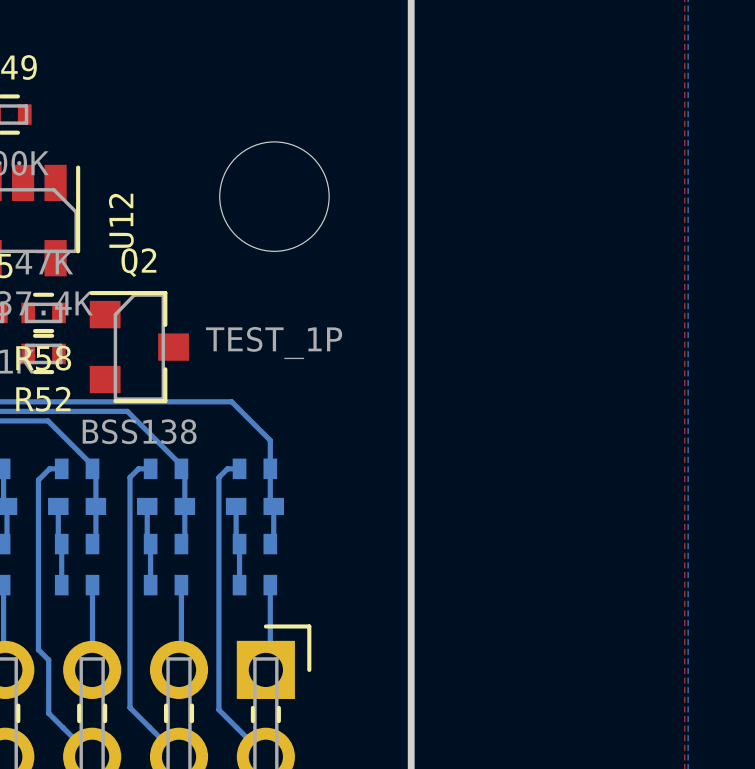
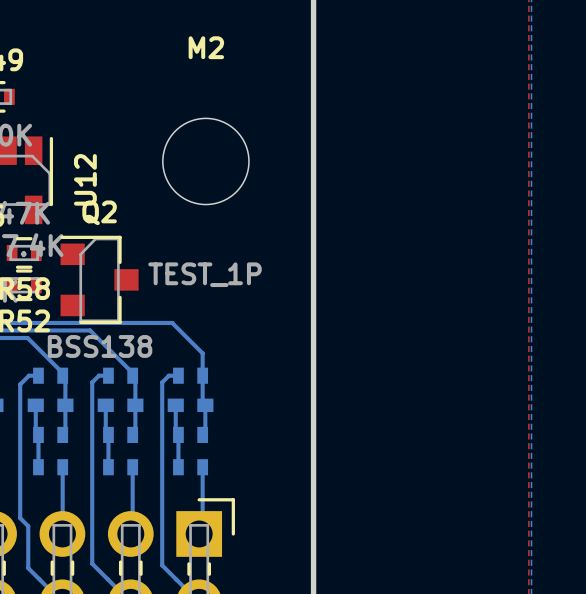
M2 name: none -> M2 (206, 47)

